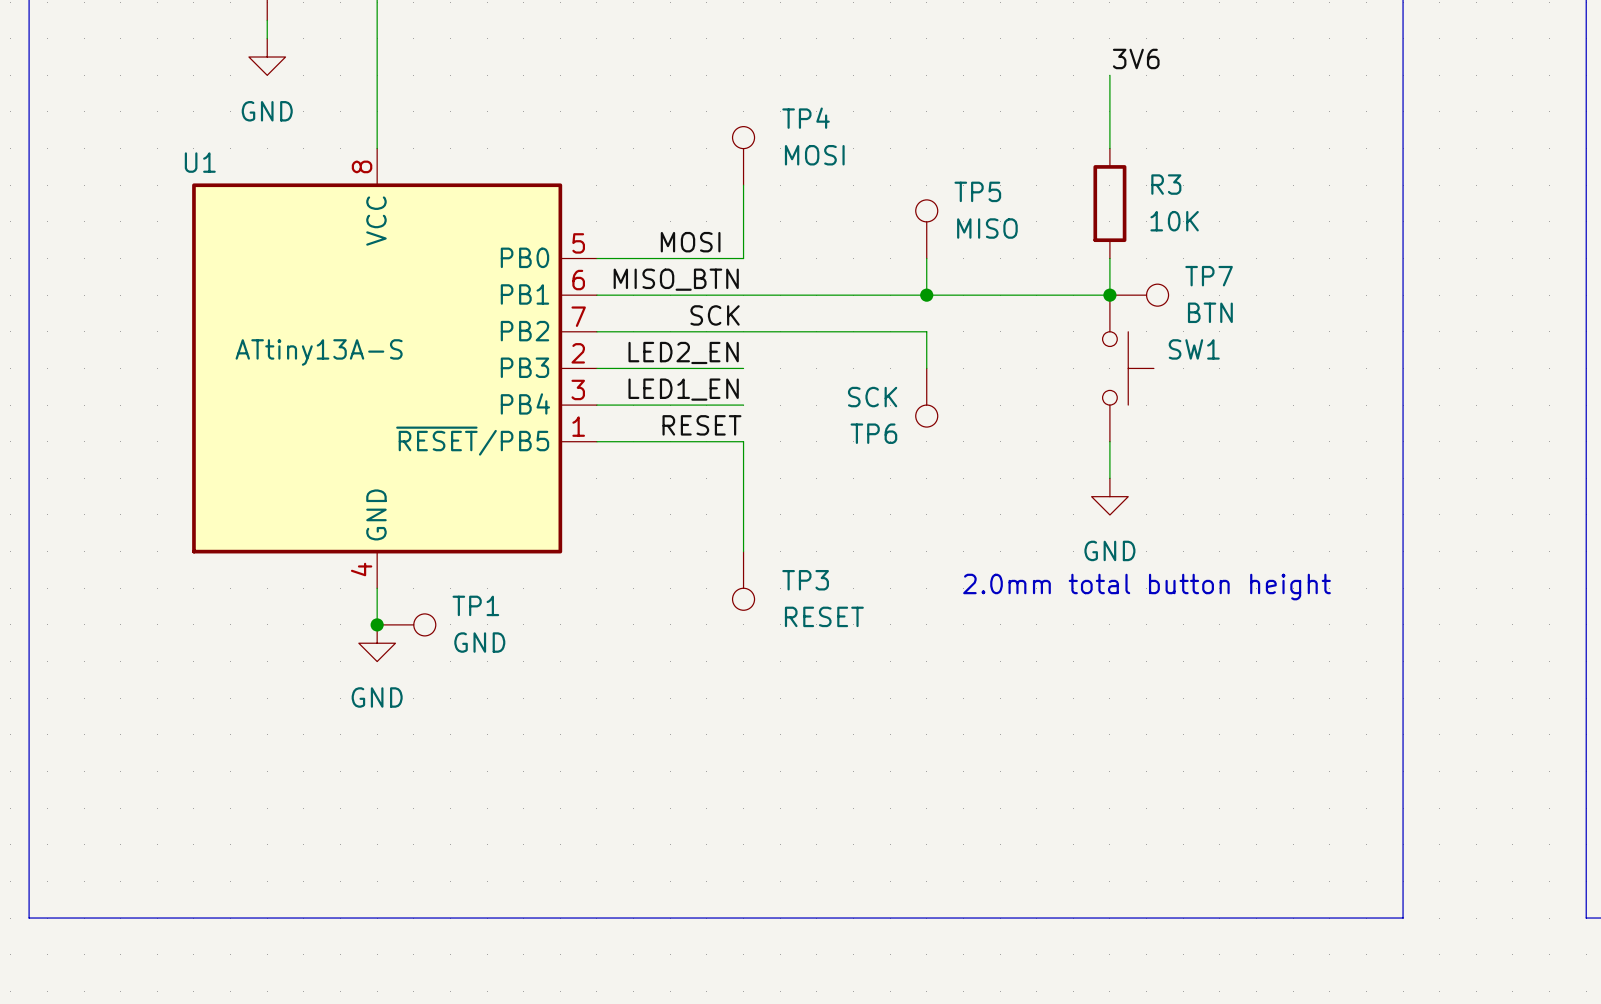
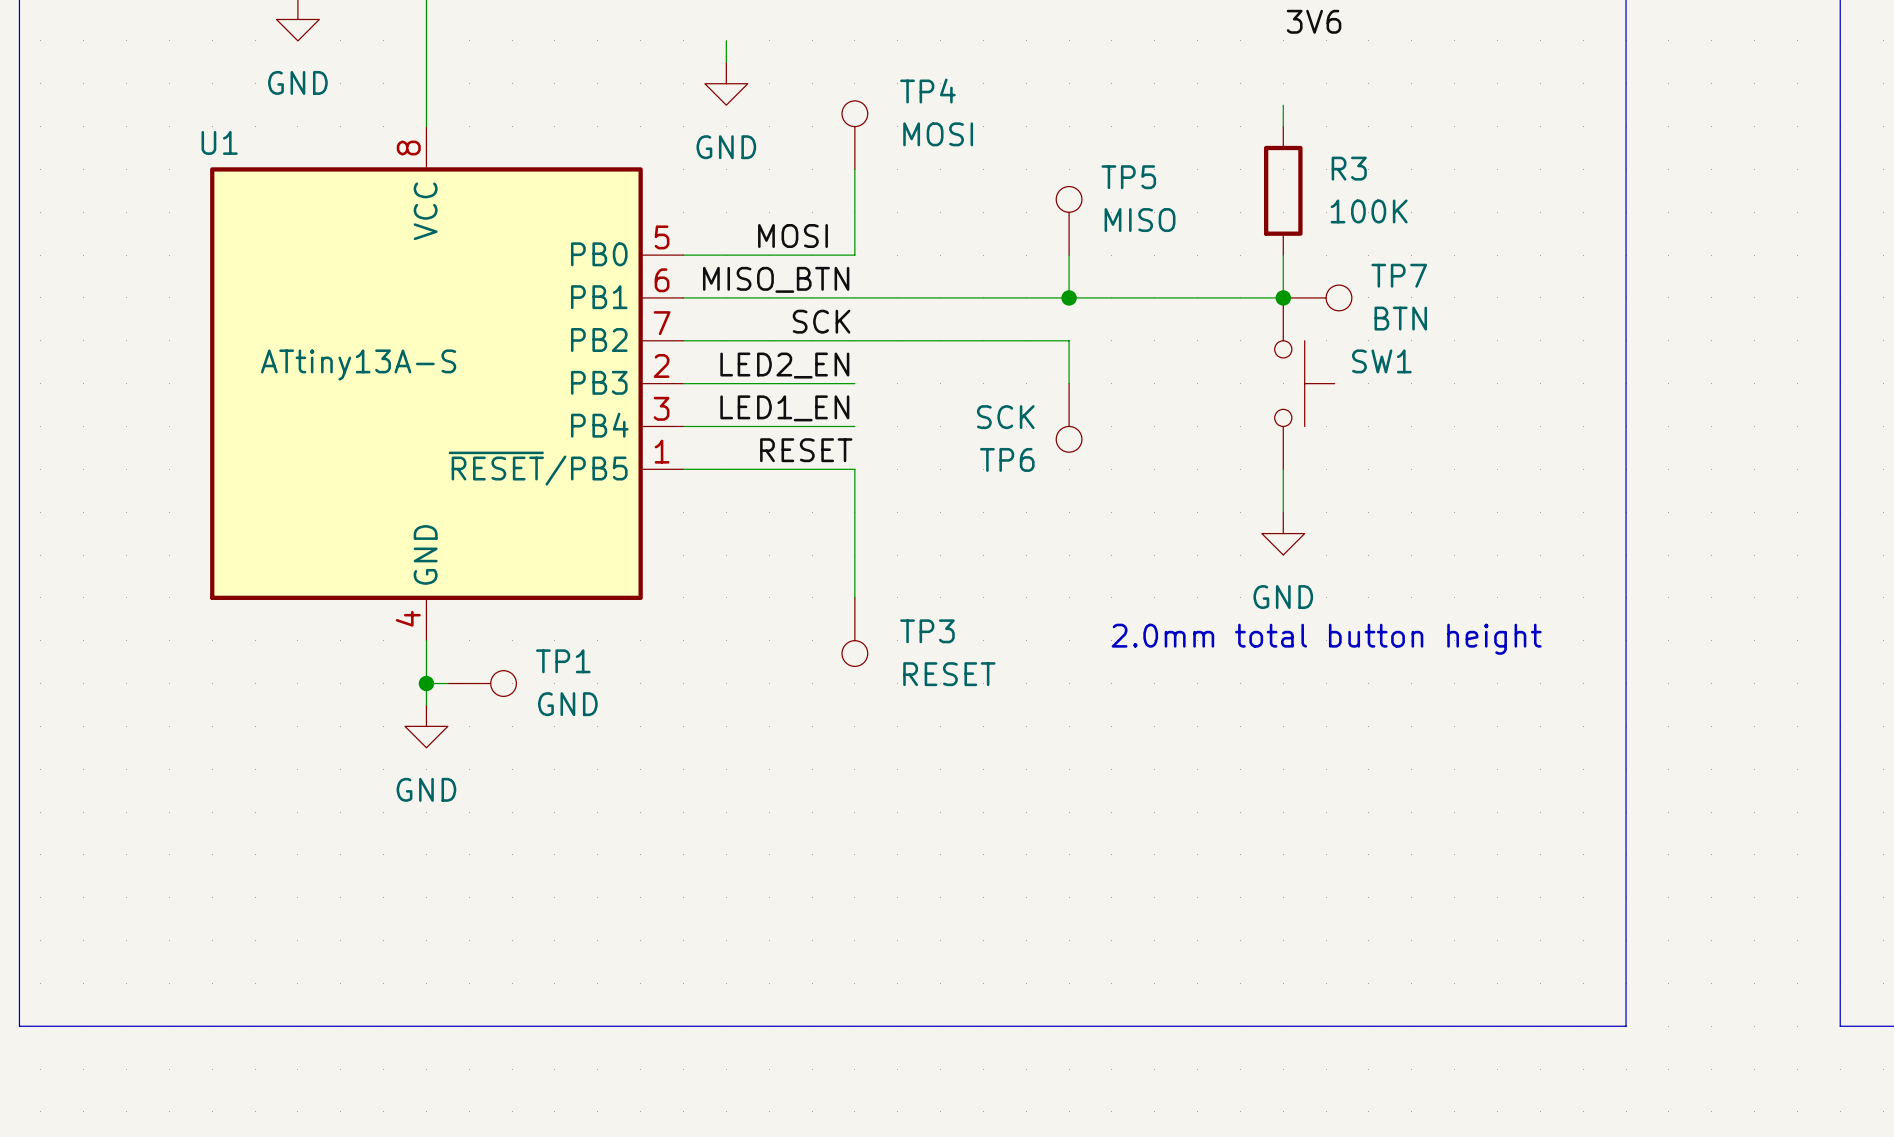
wire: none -> (726, 40) (726, 62)
wire: (1109, 75) (1109, 130) -> none
power symbol: none -> GND (726, 83)
R3 value: 10K (1174, 221) -> 100K (1369, 211)
TP1 position: (406, 624) -> (482, 683)
power symbol position: GND (377, 643) -> GND (426, 726)

